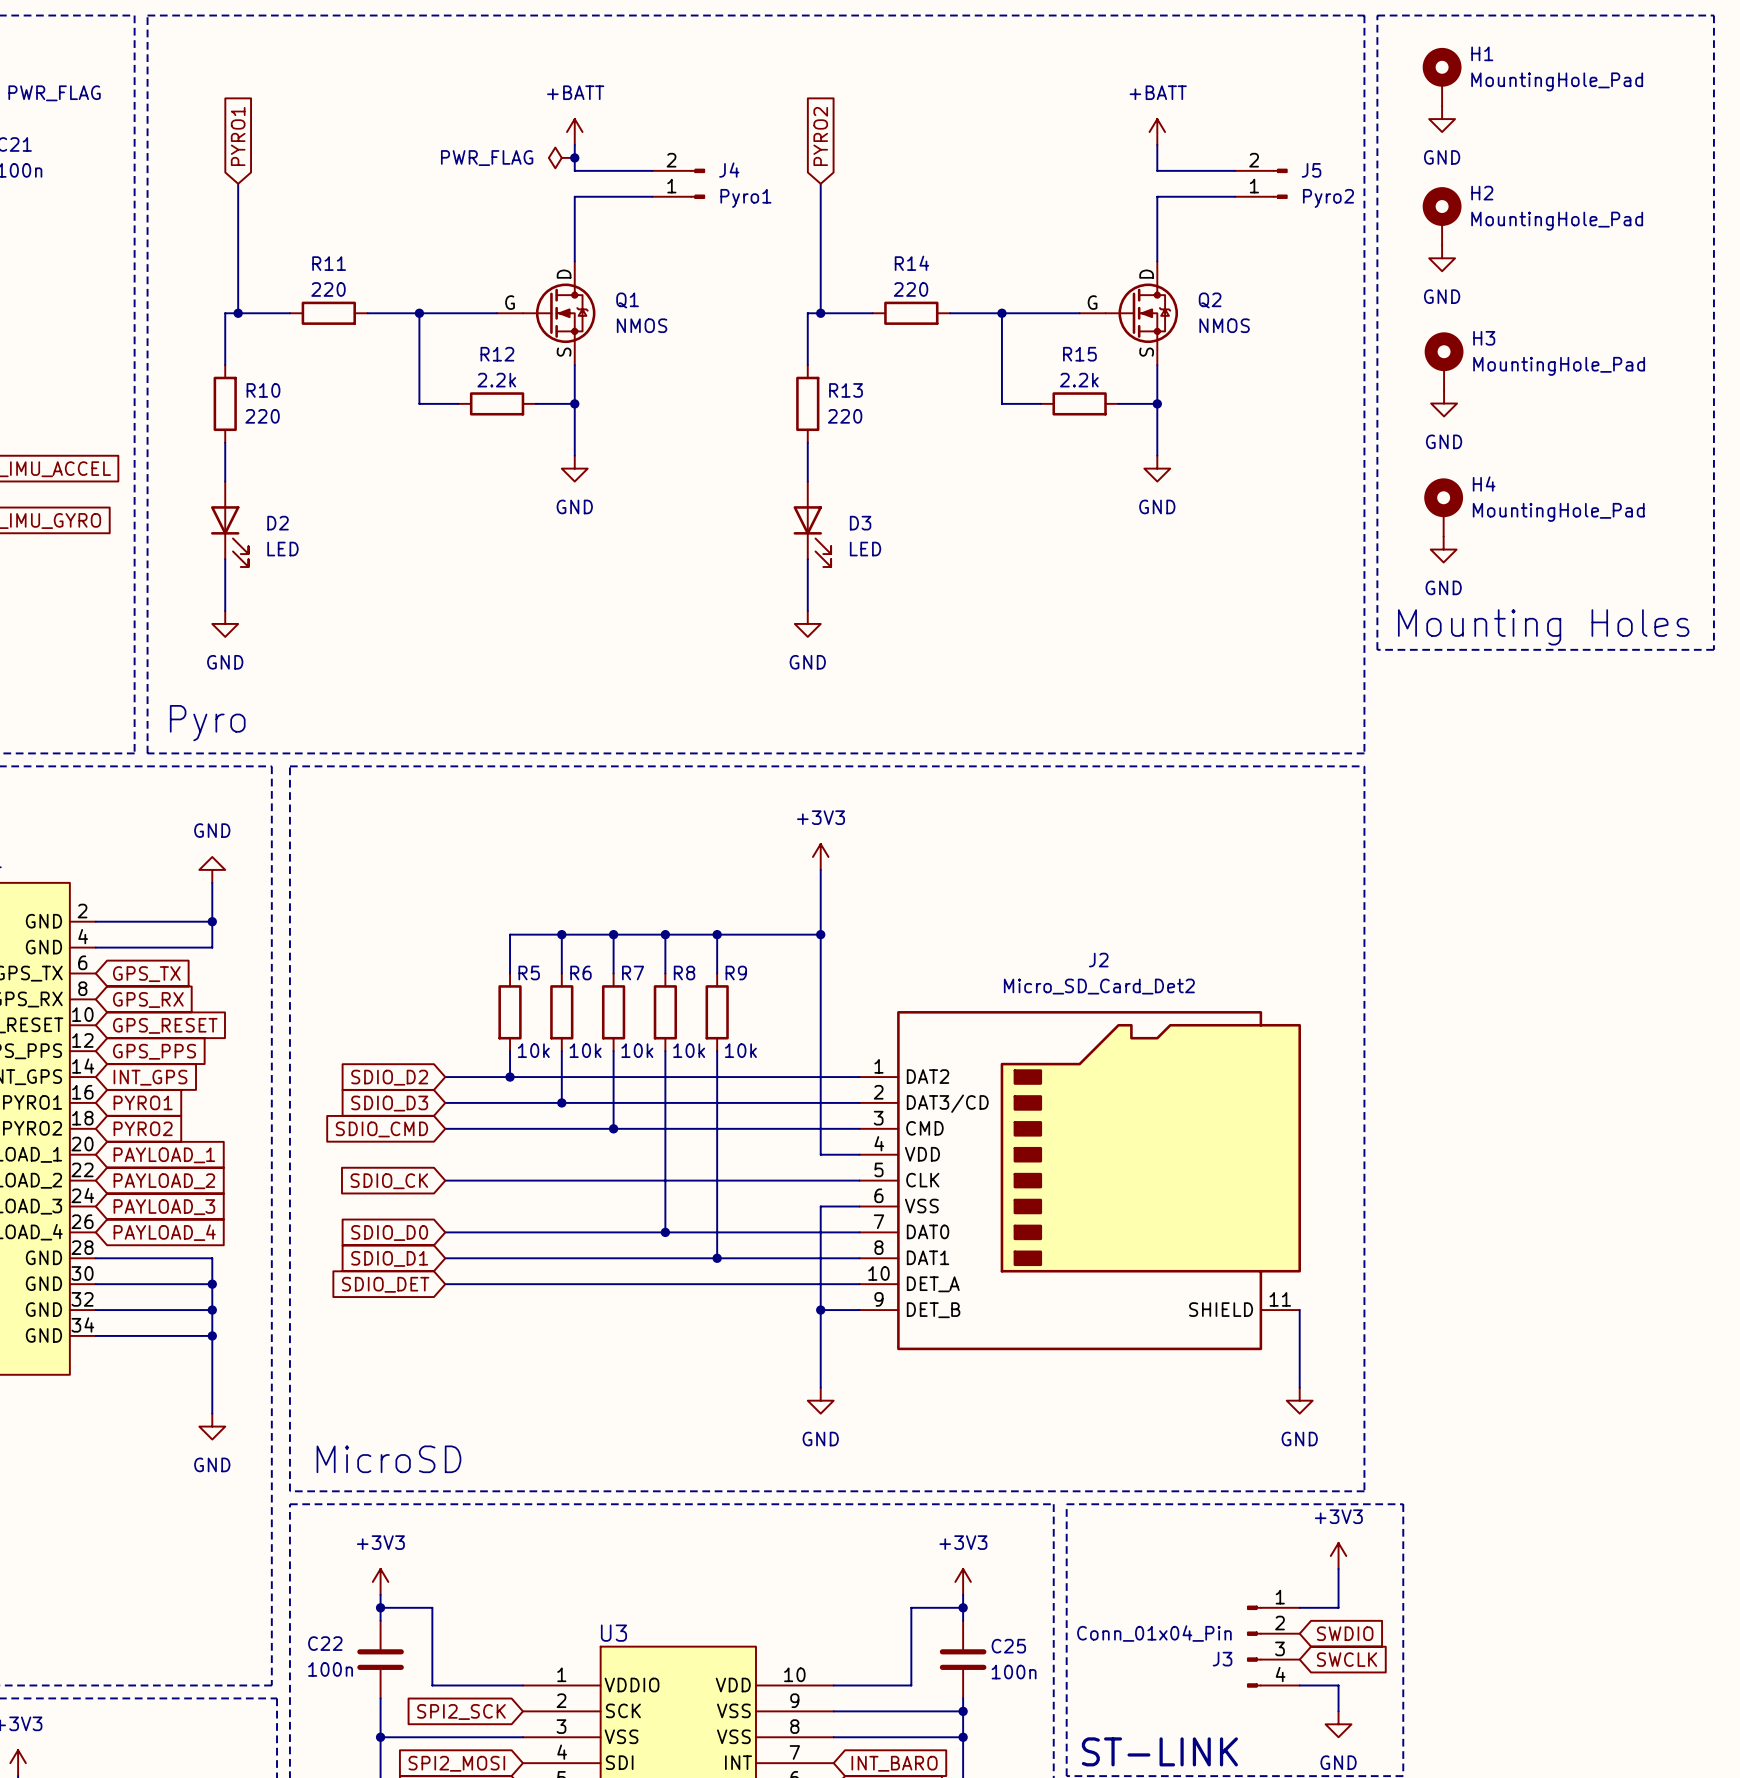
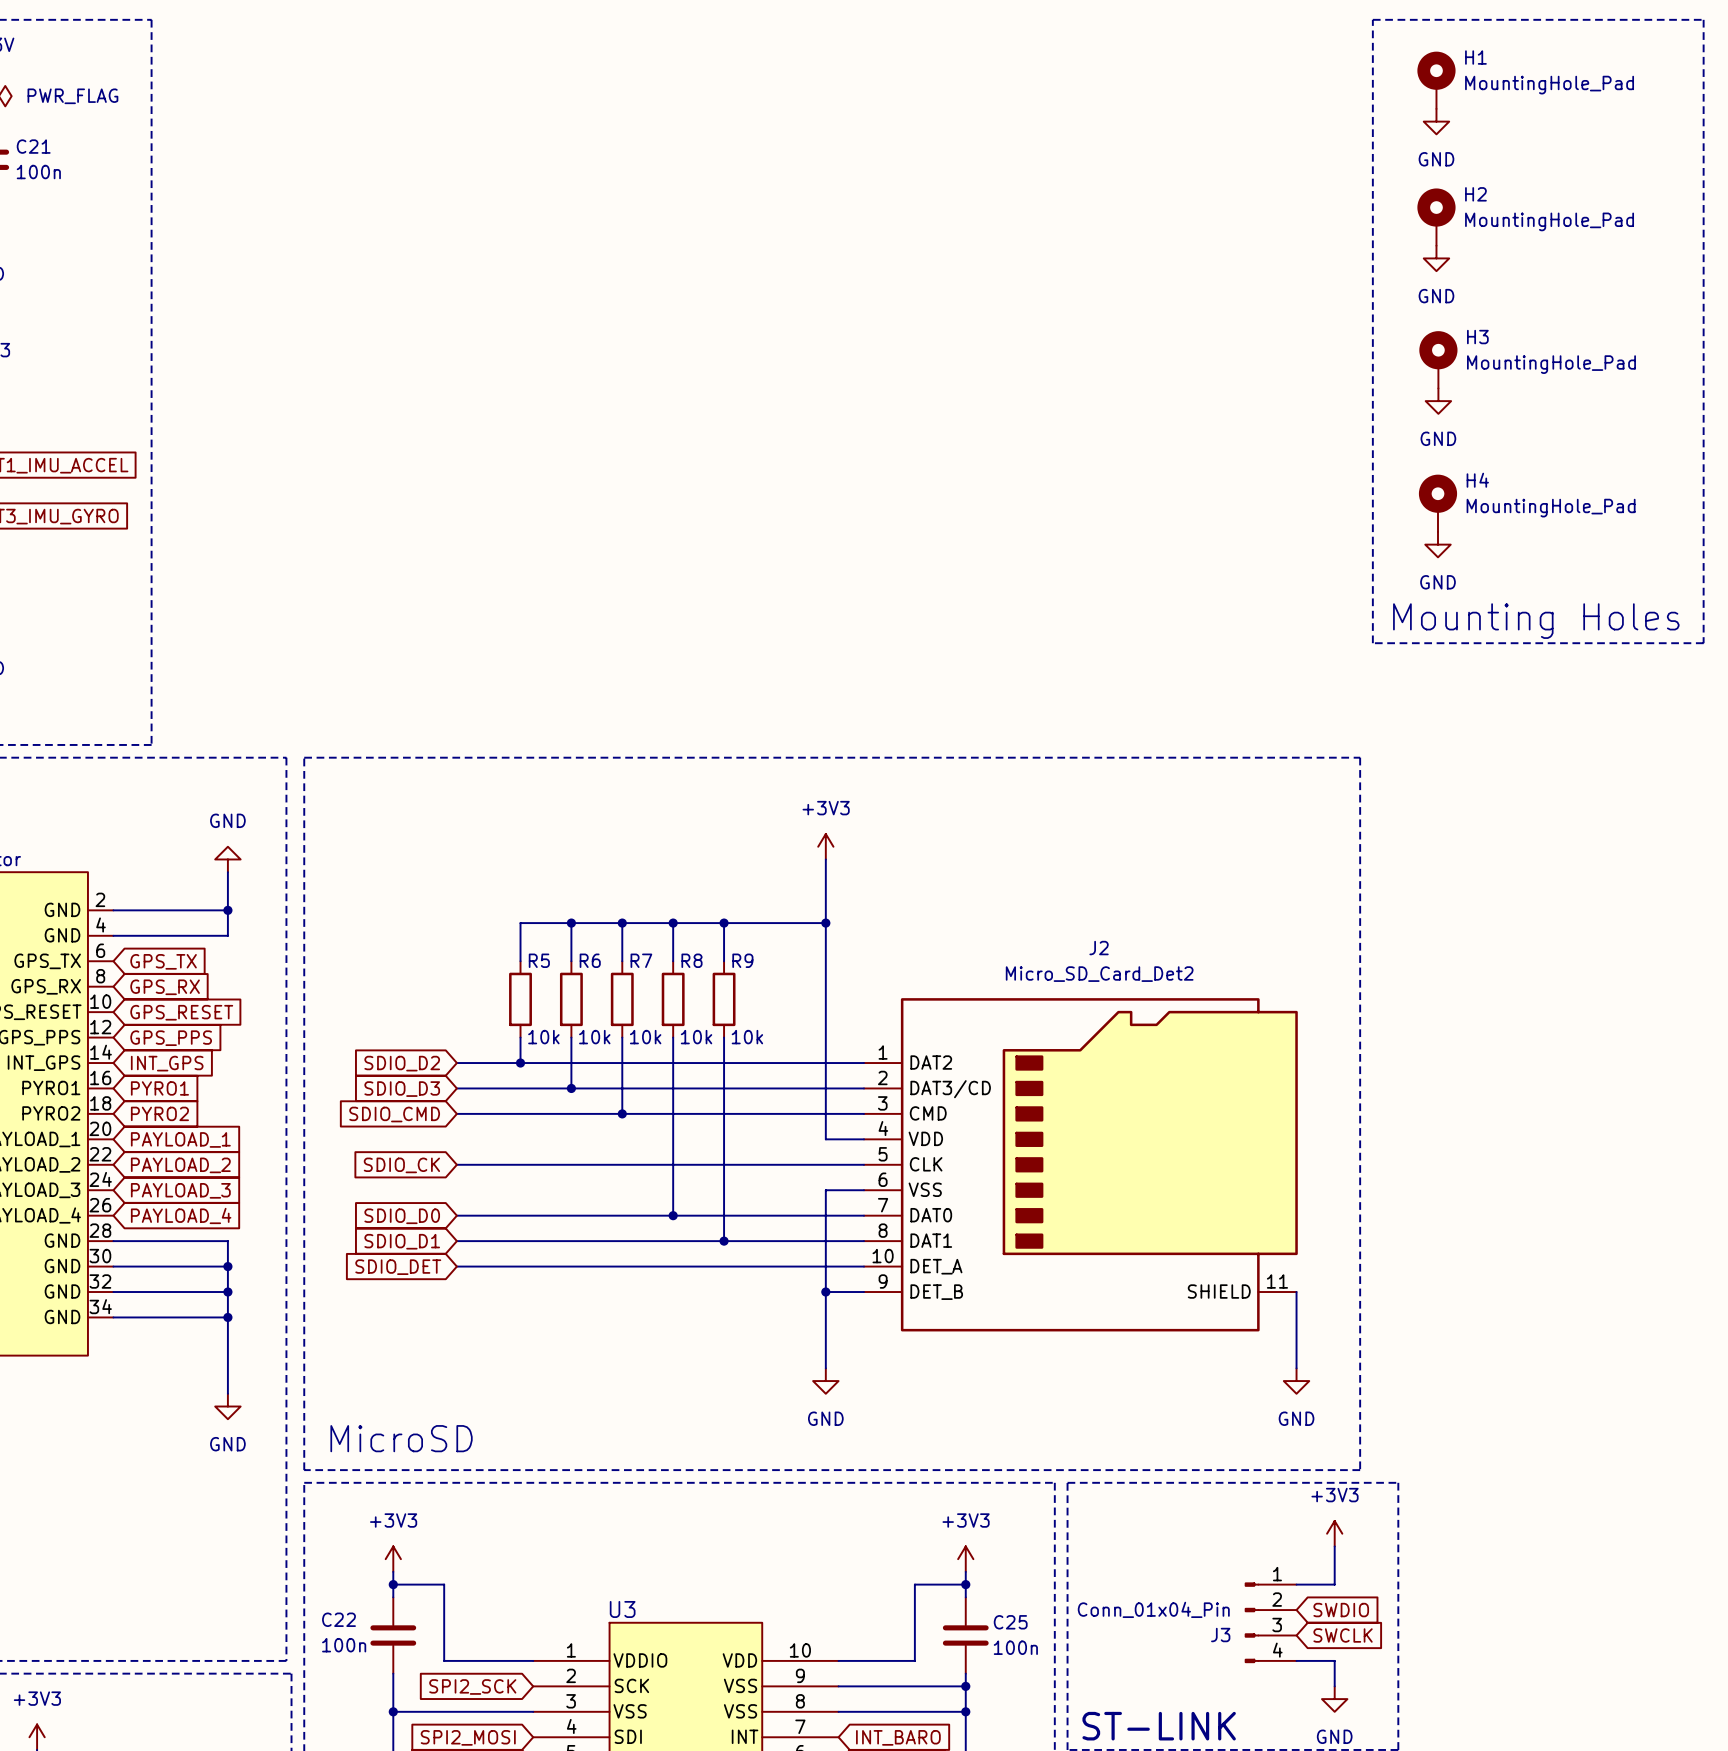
line: (147, 15) (1364, 15) (1364, 753) (147, 753) (147, 15) -> none
power symbol: +BATT (574, 132) -> none
power symbol: +BATT (1157, 132) -> none
global label: PYRO1 (238, 136) -> none
global label: PYRO2 (820, 136) -> none
wire: (574, 144) (574, 170) (652, 170) -> none
wire: (1157, 144) (1157, 170) (1234, 170) -> none
power symbol: PWR_FLAG (561, 157) -> none
junction: (574, 157) -> none
wire: (238, 183) (238, 313) -> none
J4: Pyro1 (678, 183) -> none
wire: (820, 183) (820, 313) -> none
J5: Pyro2 (1261, 183) -> none
wire: (652, 196) (574, 196) (574, 261) -> none
wire: (1234, 196) (1157, 196) (1157, 261) -> none
junction: (238, 313) -> none
wire: (289, 313) (225, 313) (225, 365) -> none
R11: 220 (328, 313) -> none
wire: (367, 313) (497, 313) -> none
wire: (419, 313) (419, 403) (458, 403) -> none
junction: (419, 313) -> none
Q1: NMOS (546, 313) -> none
junction: (820, 313) -> none
wire: (872, 313) (807, 313) (807, 365) -> none
R14: 220 (911, 313) -> none
wire: (950, 313) (1079, 313) -> none
wire: (1001, 313) (1001, 403) (1040, 403) -> none
junction: (1001, 313) -> none
Q2: NMOS (1128, 313) -> none
wire: (574, 365) (574, 455) -> none
wire: (1157, 365) (1157, 455) -> none
R10: 220 (225, 403) -> none
R12: 2.2k (497, 403) -> none
wire: (535, 403) (574, 403) -> none
junction: (574, 403) -> none
R13: 220 (807, 403) -> none
R15: 2.2k (1079, 403) -> none
wire: (1118, 403) (1157, 403) -> none
junction: (1157, 403) -> none
wire: (225, 442) (225, 481) -> none
wire: (807, 442) (807, 481) -> none
power symbol: GND (574, 468) -> none
power symbol: GND (1157, 468) -> none
D2: LED (229, 524) -> none
D3: LED (812, 524) -> none
wire: (225, 559) (225, 611) -> none
wire: (807, 559) (807, 611) -> none
power symbol: GND (225, 623) -> none
power symbol: GND (807, 623) -> none
text: Pyro (207, 723) -> none

